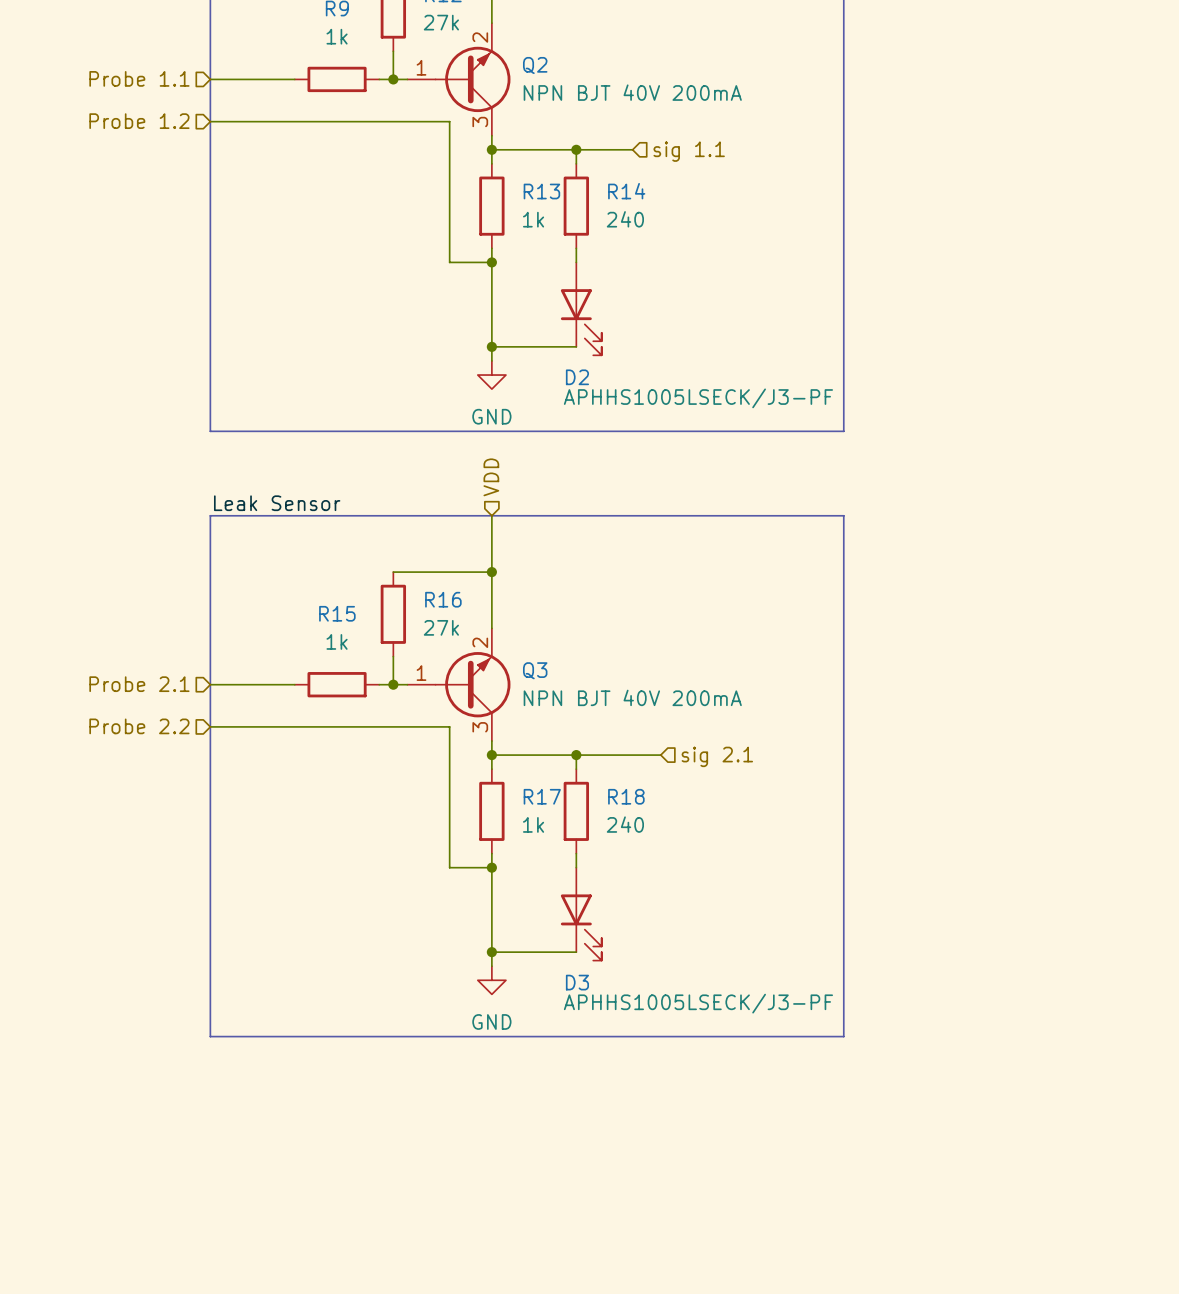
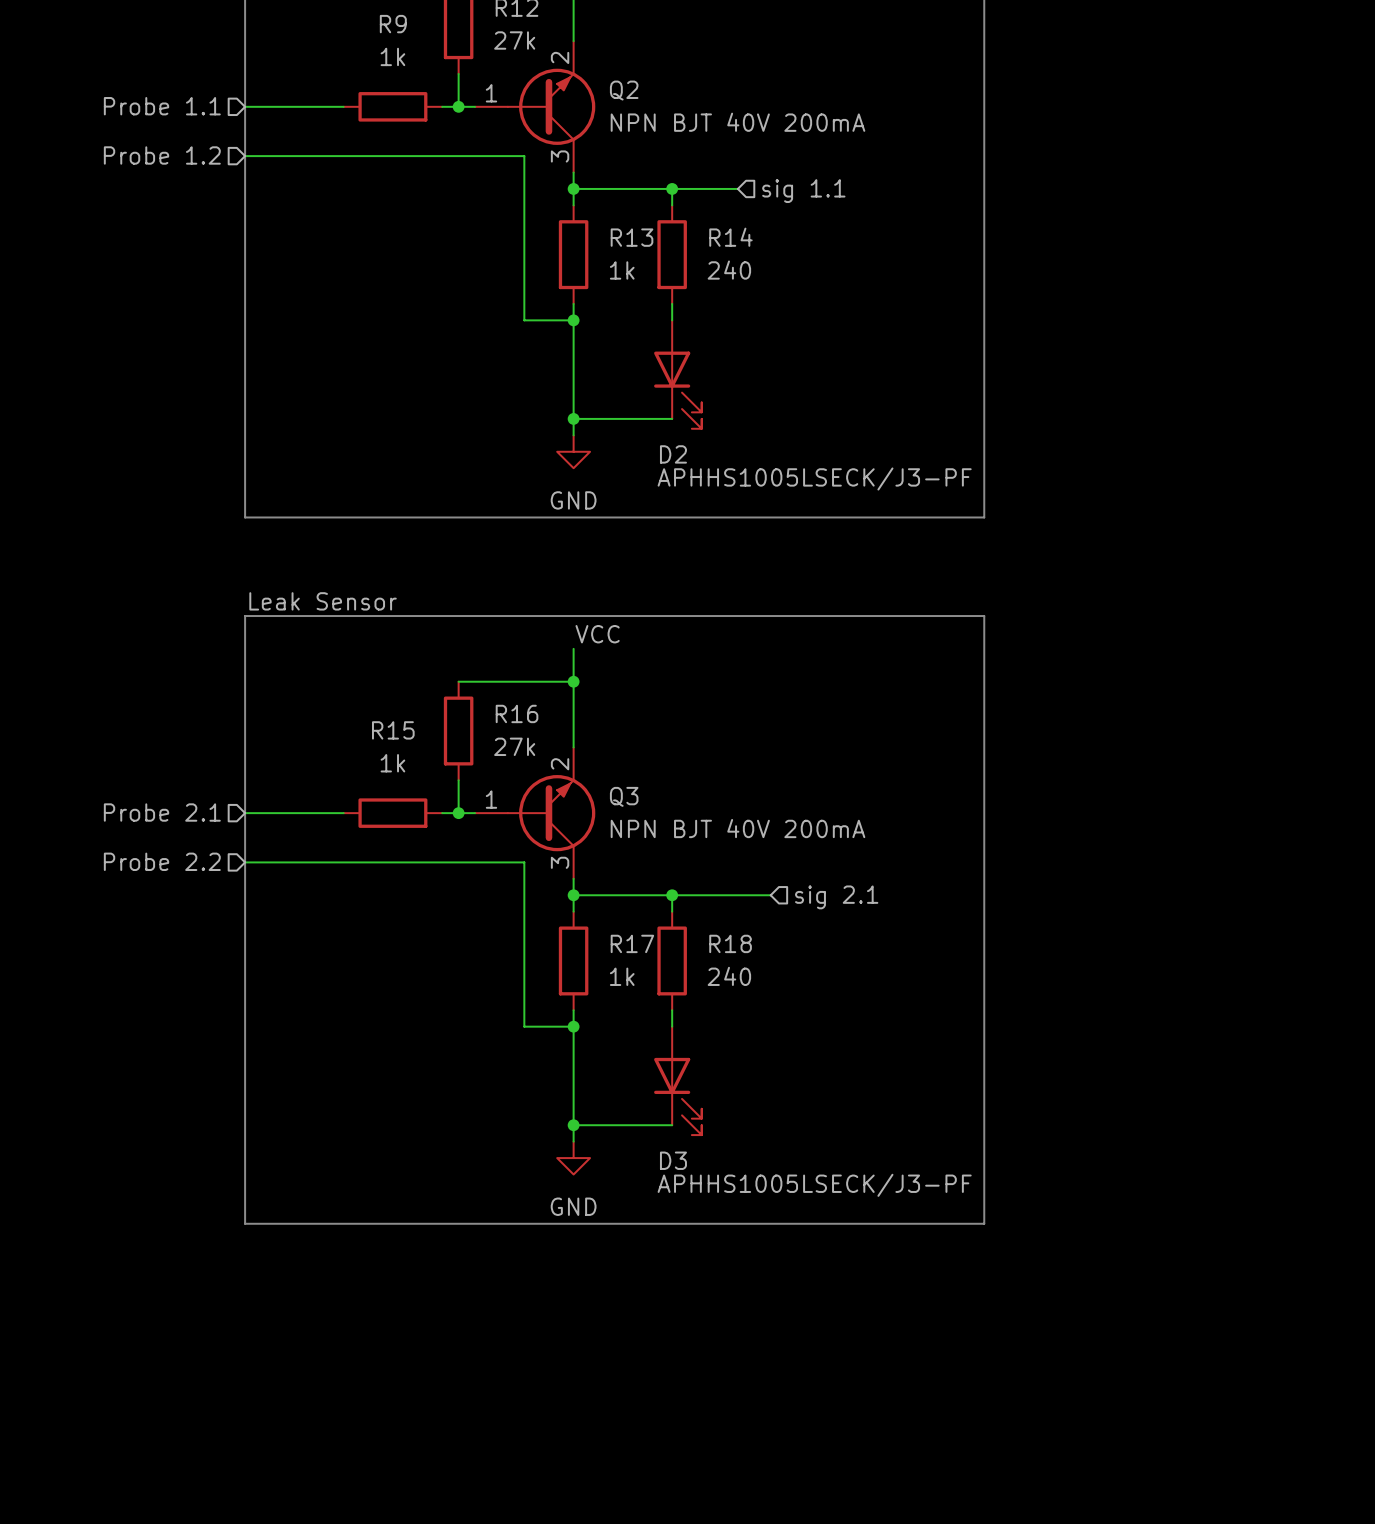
hierarchical label: VDD (491, 477) -> none
wire: (491, 515) (491, 543) -> none
label: none -> VCC (597, 634)

